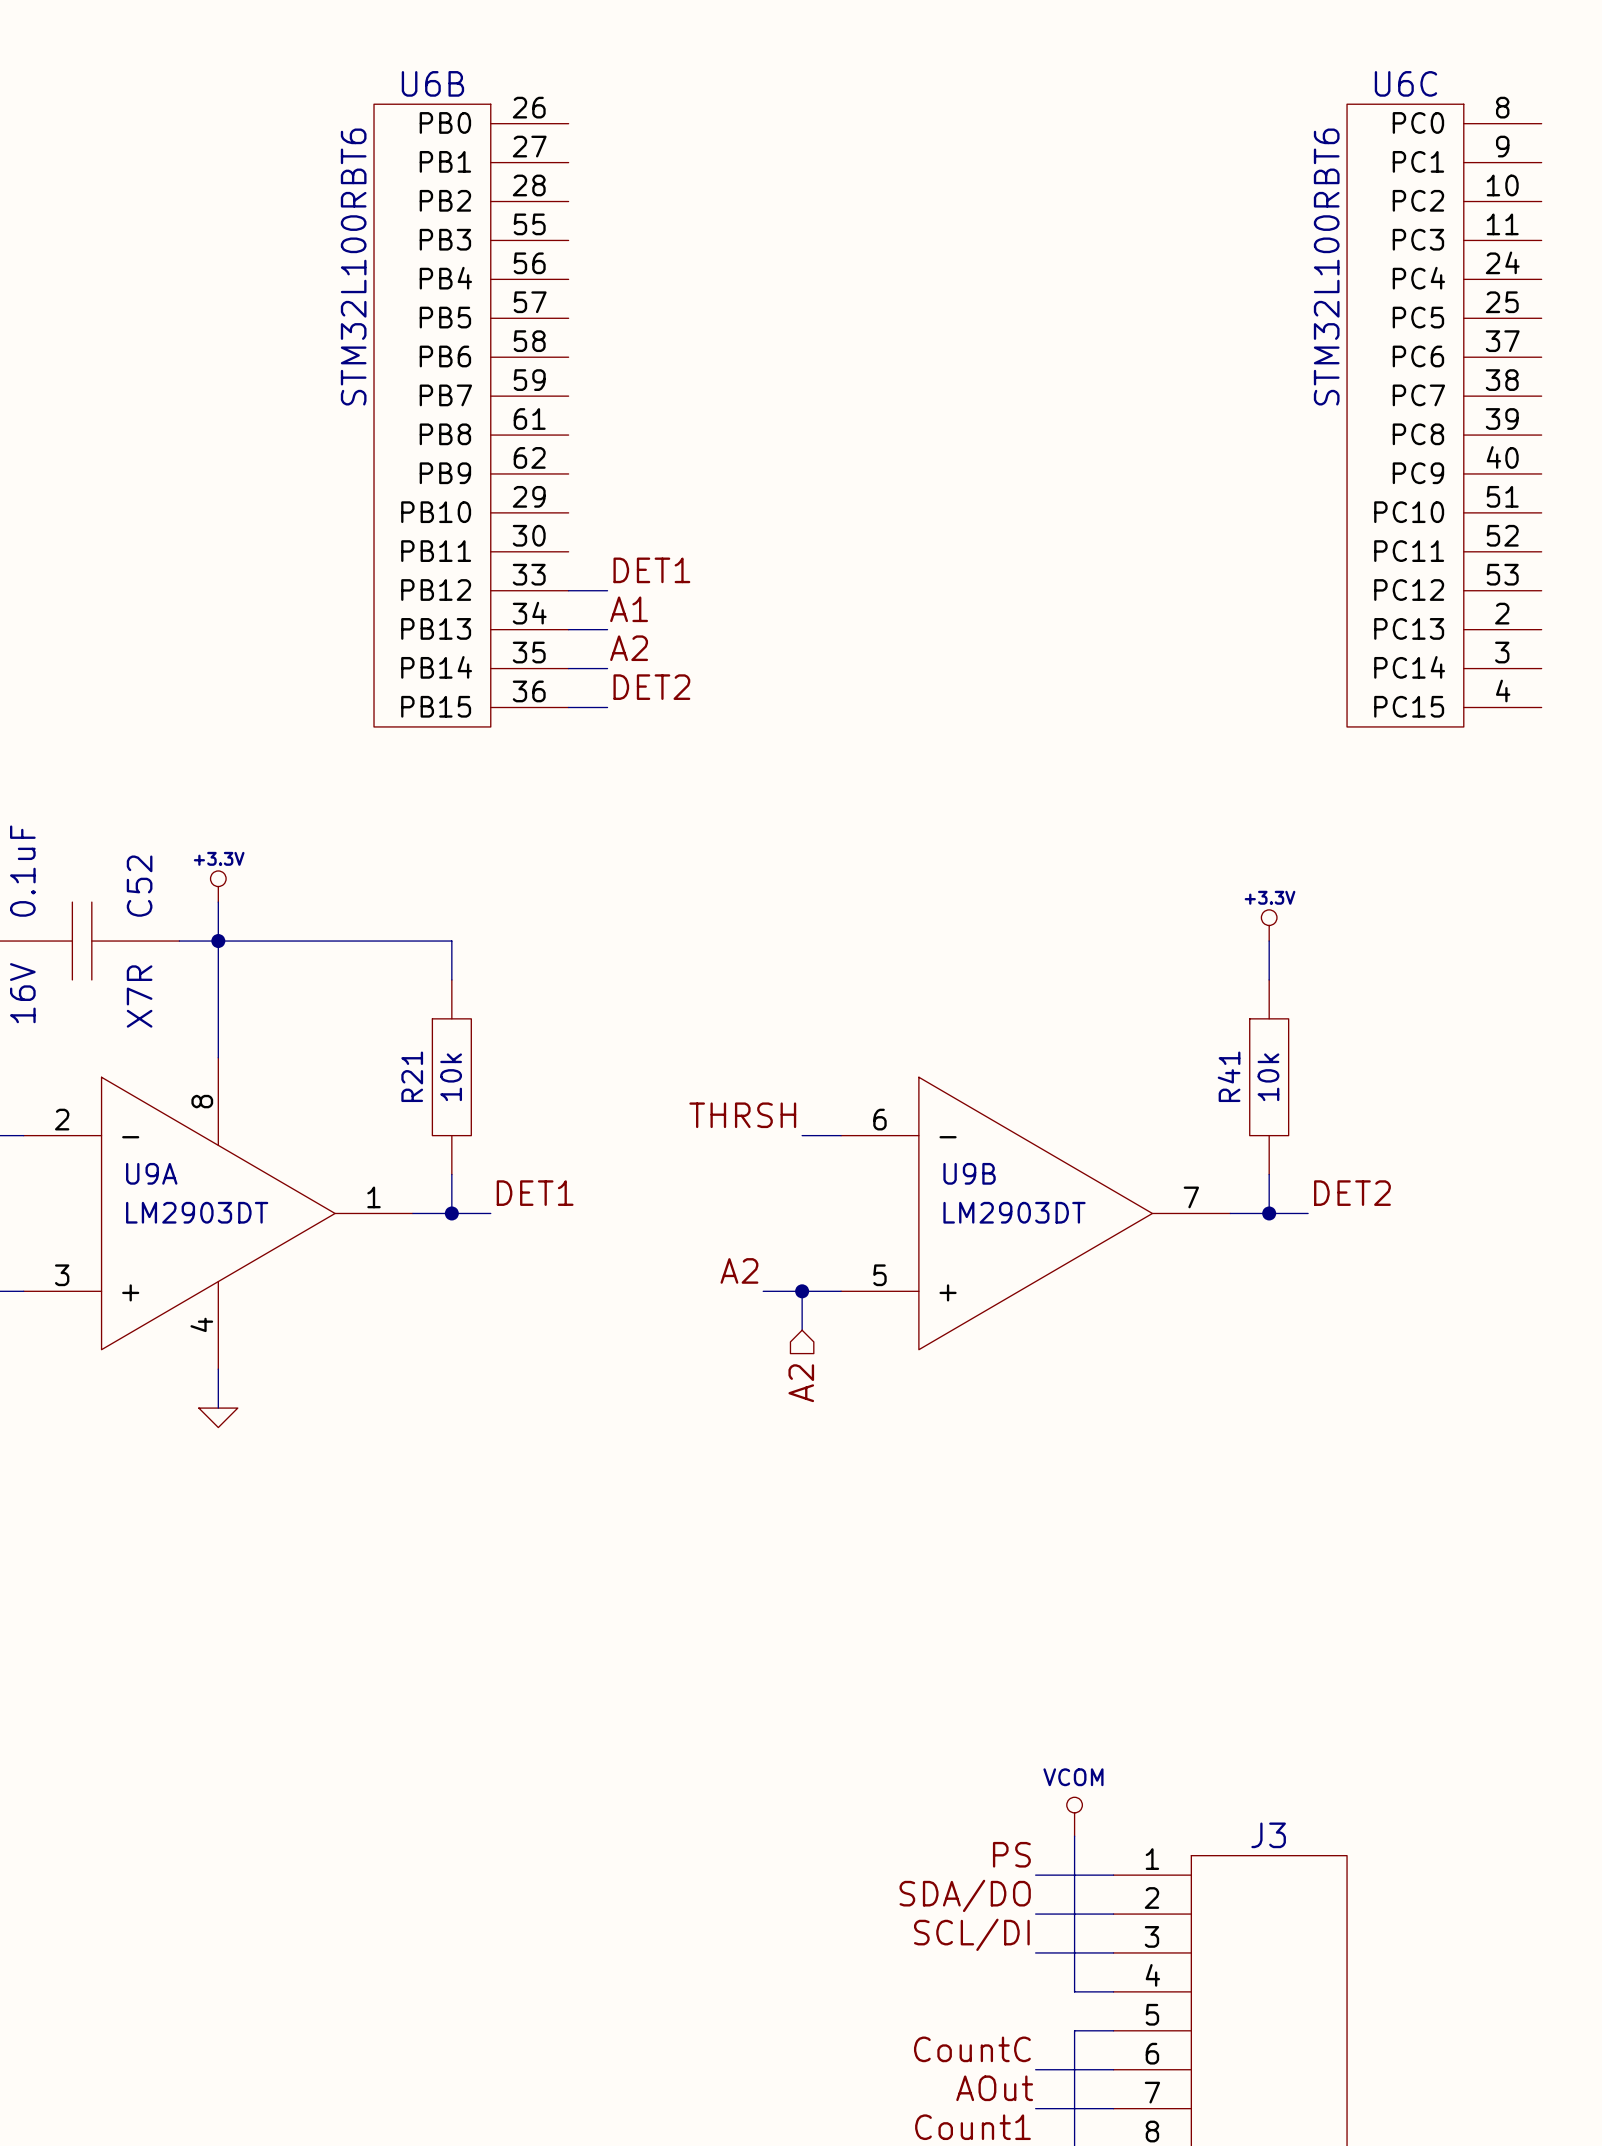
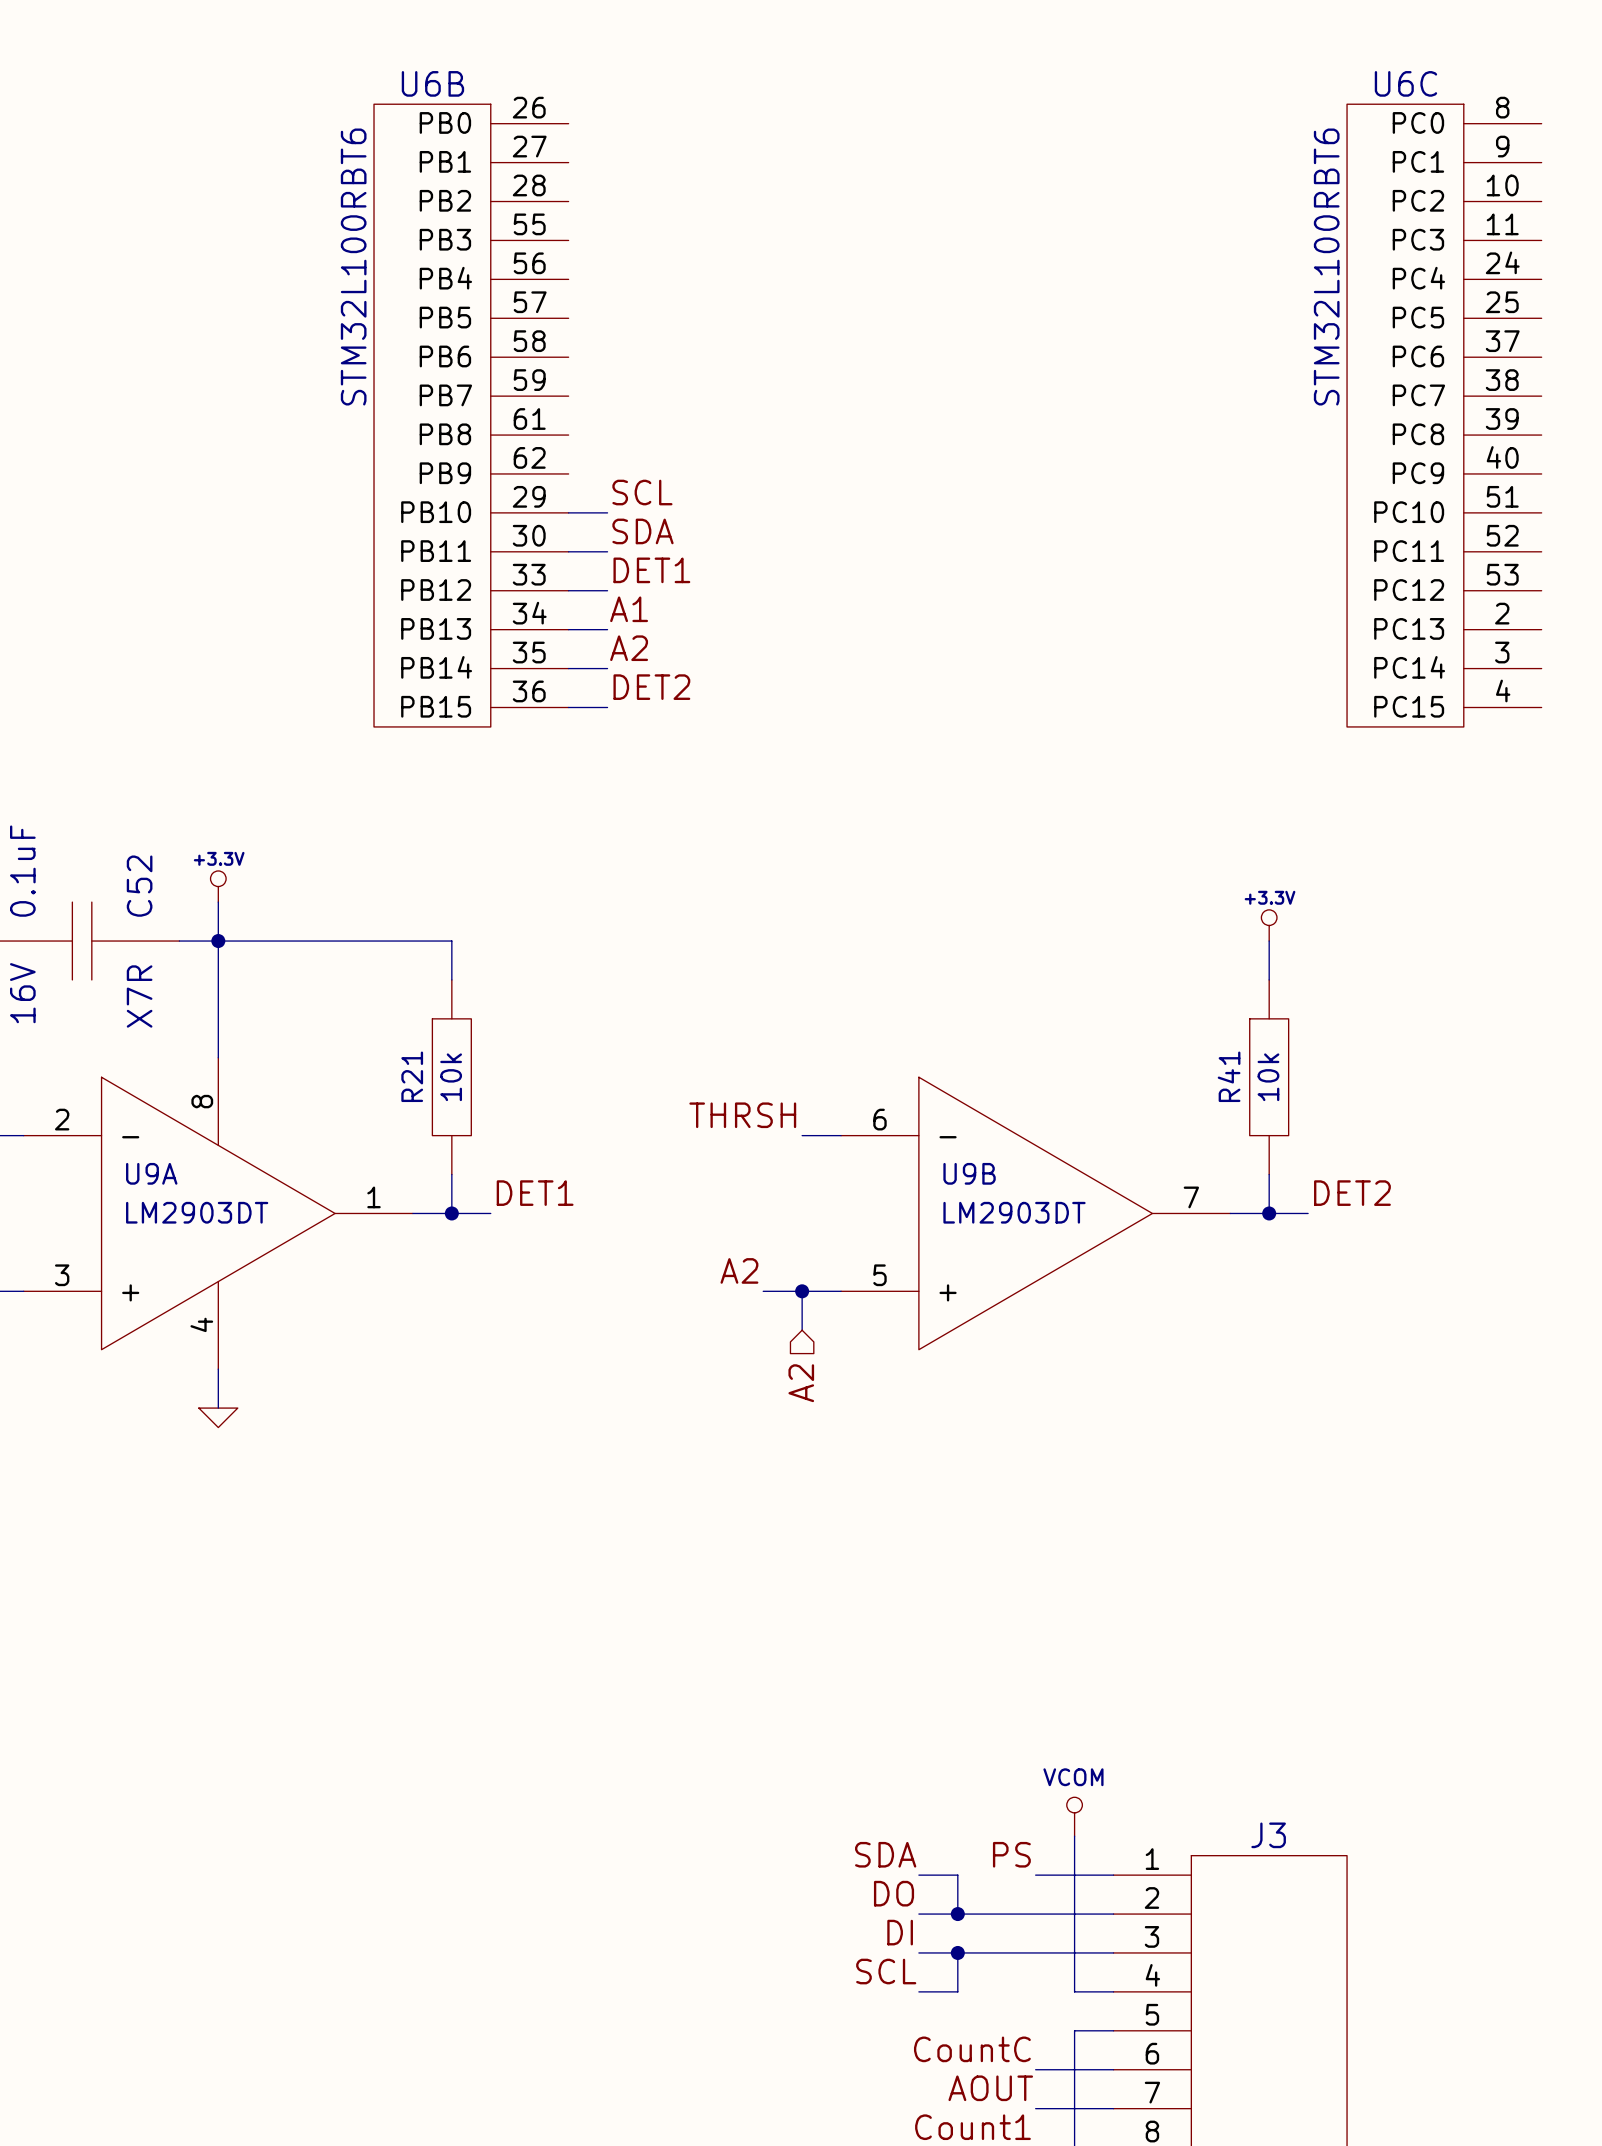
label: none -> SCL (642, 492)
wire: none -> (568, 512) (607, 512)
label: none -> SDA (642, 531)
wire: none -> (568, 551) (607, 551)
wire: none -> (918, 1875) (957, 1875) (957, 1914)
label: none -> DO (894, 1893)
label: SDA/DO (965, 1895) -> SDA (885, 1854)
wire: none -> (918, 1914) (1035, 1914)
junction: none -> (957, 1914)
label: none -> DI (900, 1932)
label: SCL/DI (971, 1934) -> SCL (886, 1971)
wire: none -> (918, 1952) (1035, 1952)
wire: none -> (957, 1952) (957, 1991) (918, 1991)
junction: none -> (957, 1952)
label: AOut (994, 2088) -> AOUT (990, 2088)

